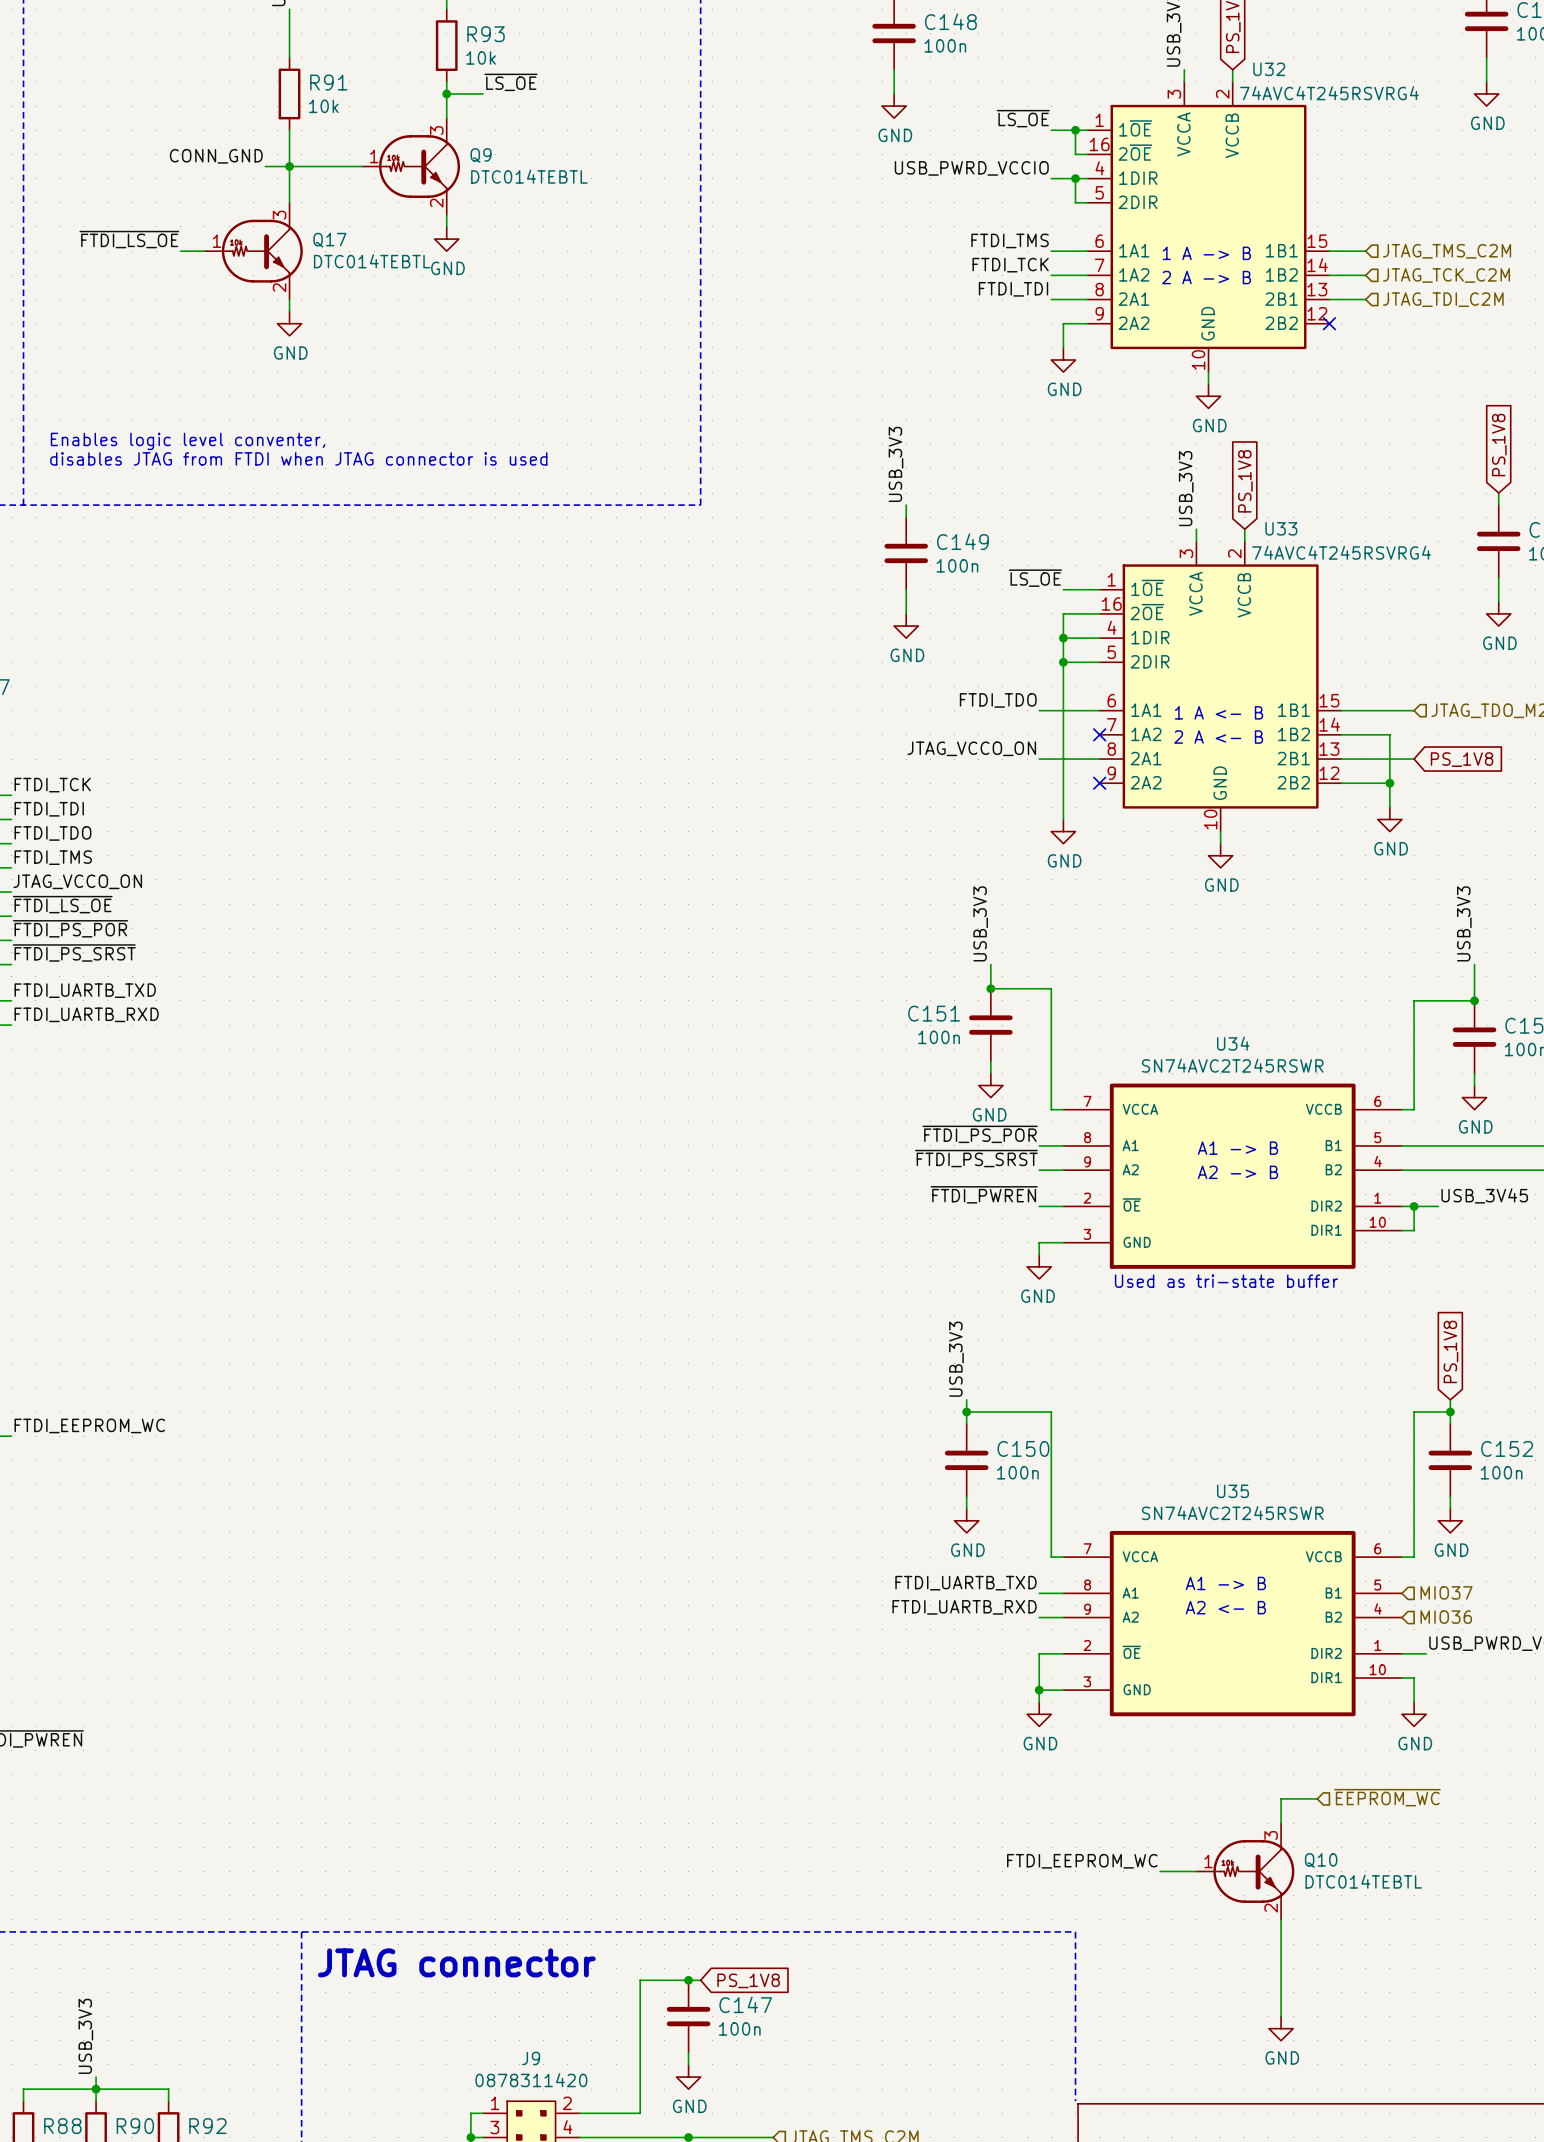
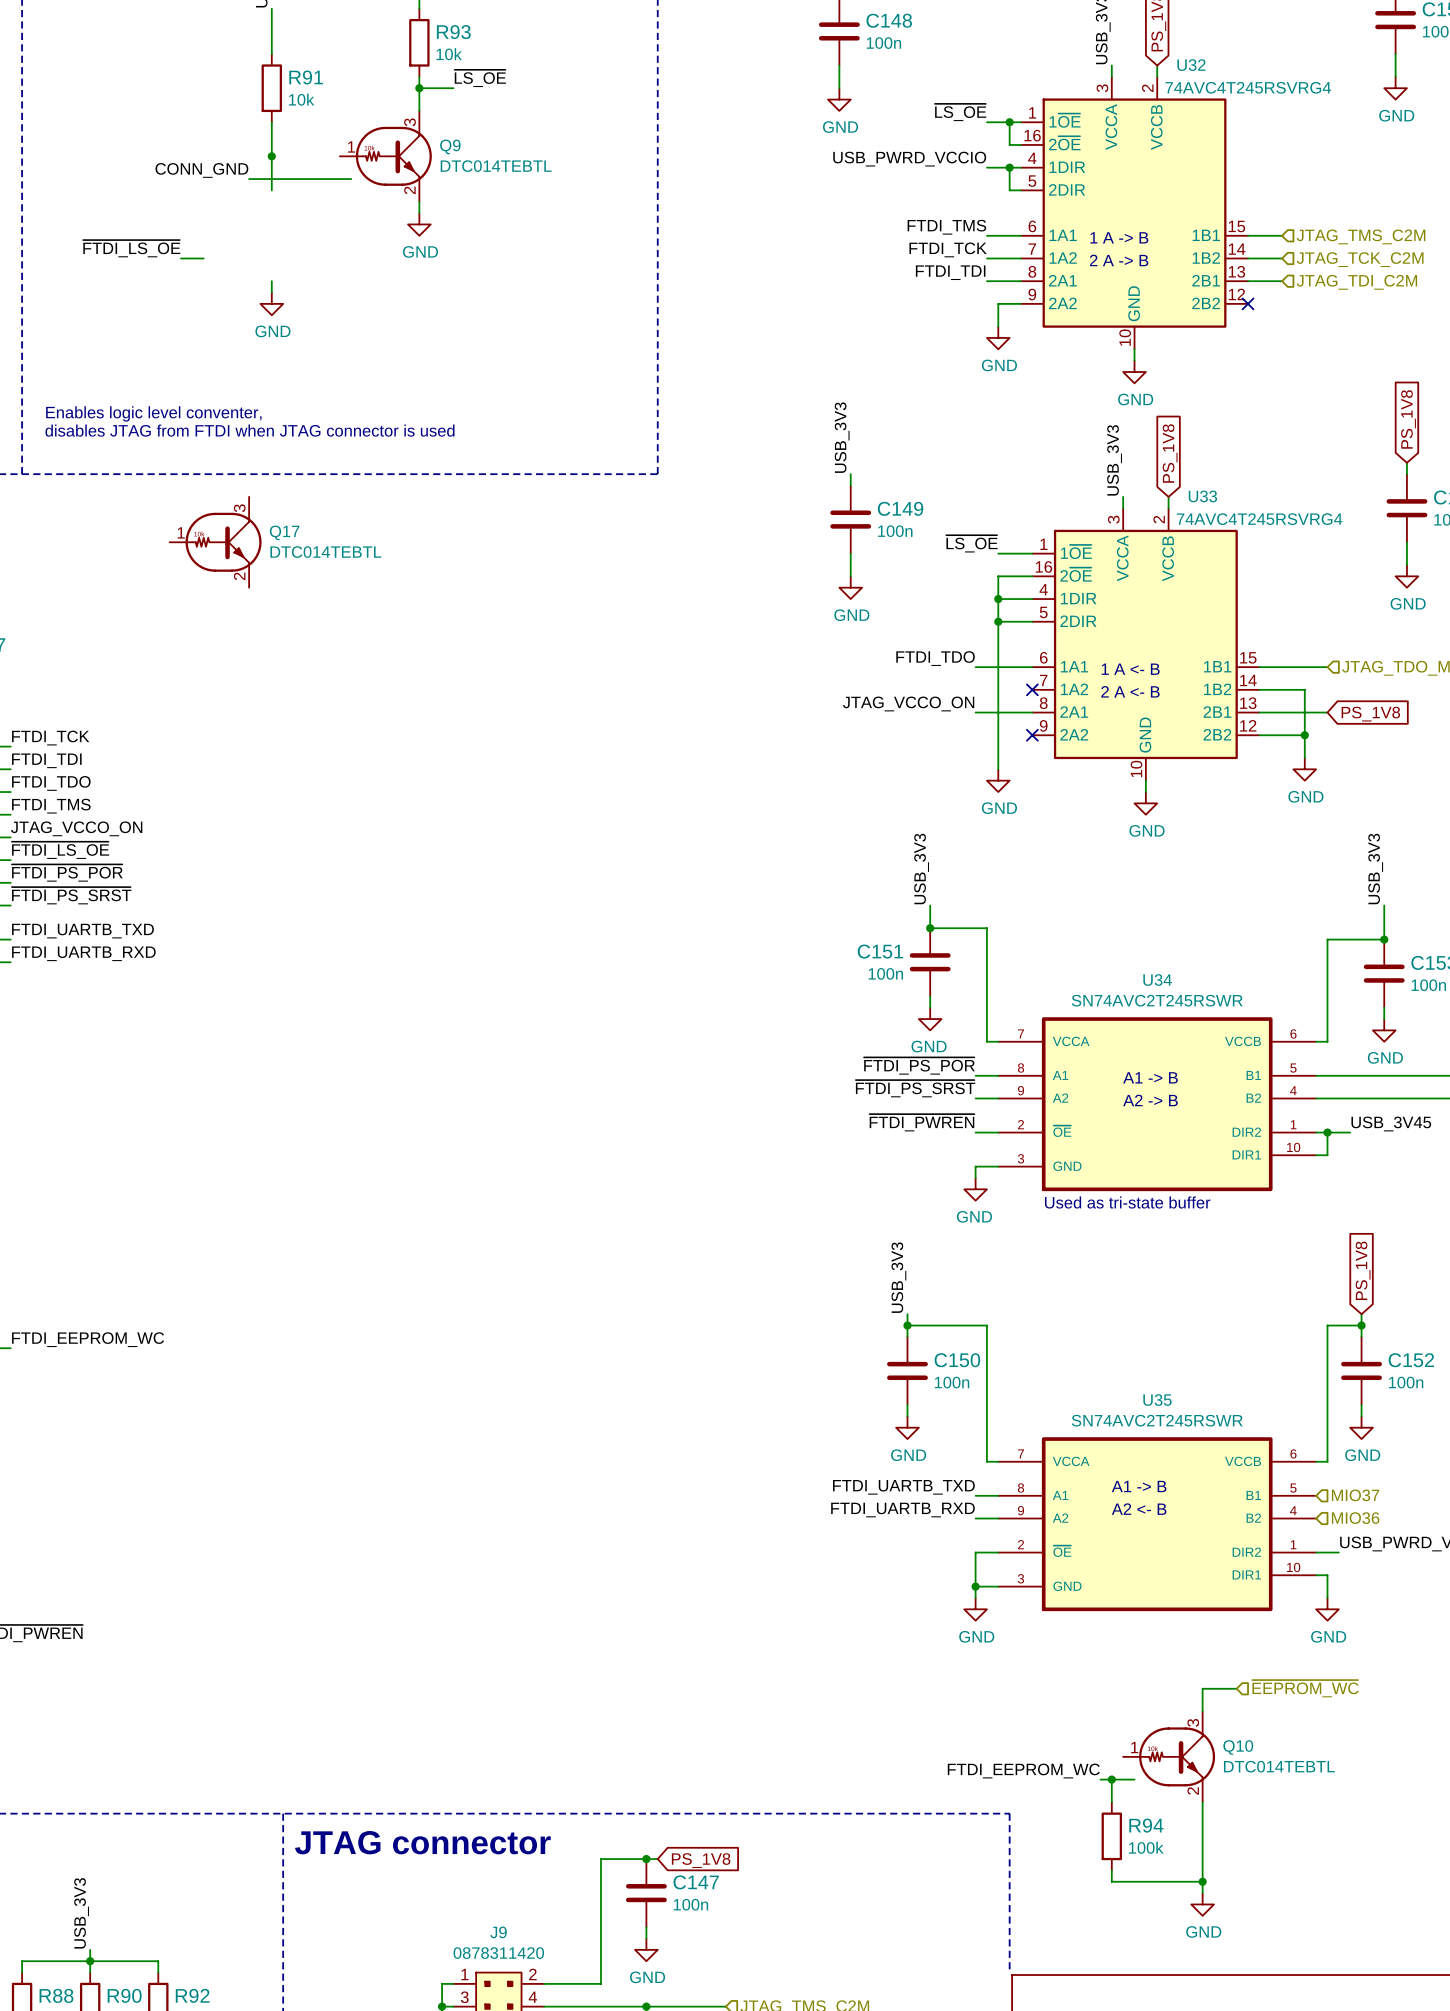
label position: CONN_GND (216, 156) -> CONN_GND (201, 170)
wire: (265, 166) (362, 166) -> none
wire: none -> (249, 179) (351, 179)
label position: ~{FTDI_LS_OE} (129, 239) -> ~{FTDI_LS_OE} (131, 248)
wire: (180, 251) (204, 251) -> (180, 258) (203, 258)
Q17 position: (253, 251) -> (215, 542)
label position: FTDI_EEPROM_WC (1082, 1861) -> FTDI_EEPROM_WC (1023, 1771)
wire: (1160, 1871) (1196, 1871) -> (1100, 1779) (1134, 1779)
wire: none -> (1111, 1779) (1111, 1802)
junction: none -> (1111, 1779)
R94: none -> (1111, 1836)
wire: none -> (1111, 1870) (1111, 1881) (1202, 1881)
junction: none -> (1202, 1881)

